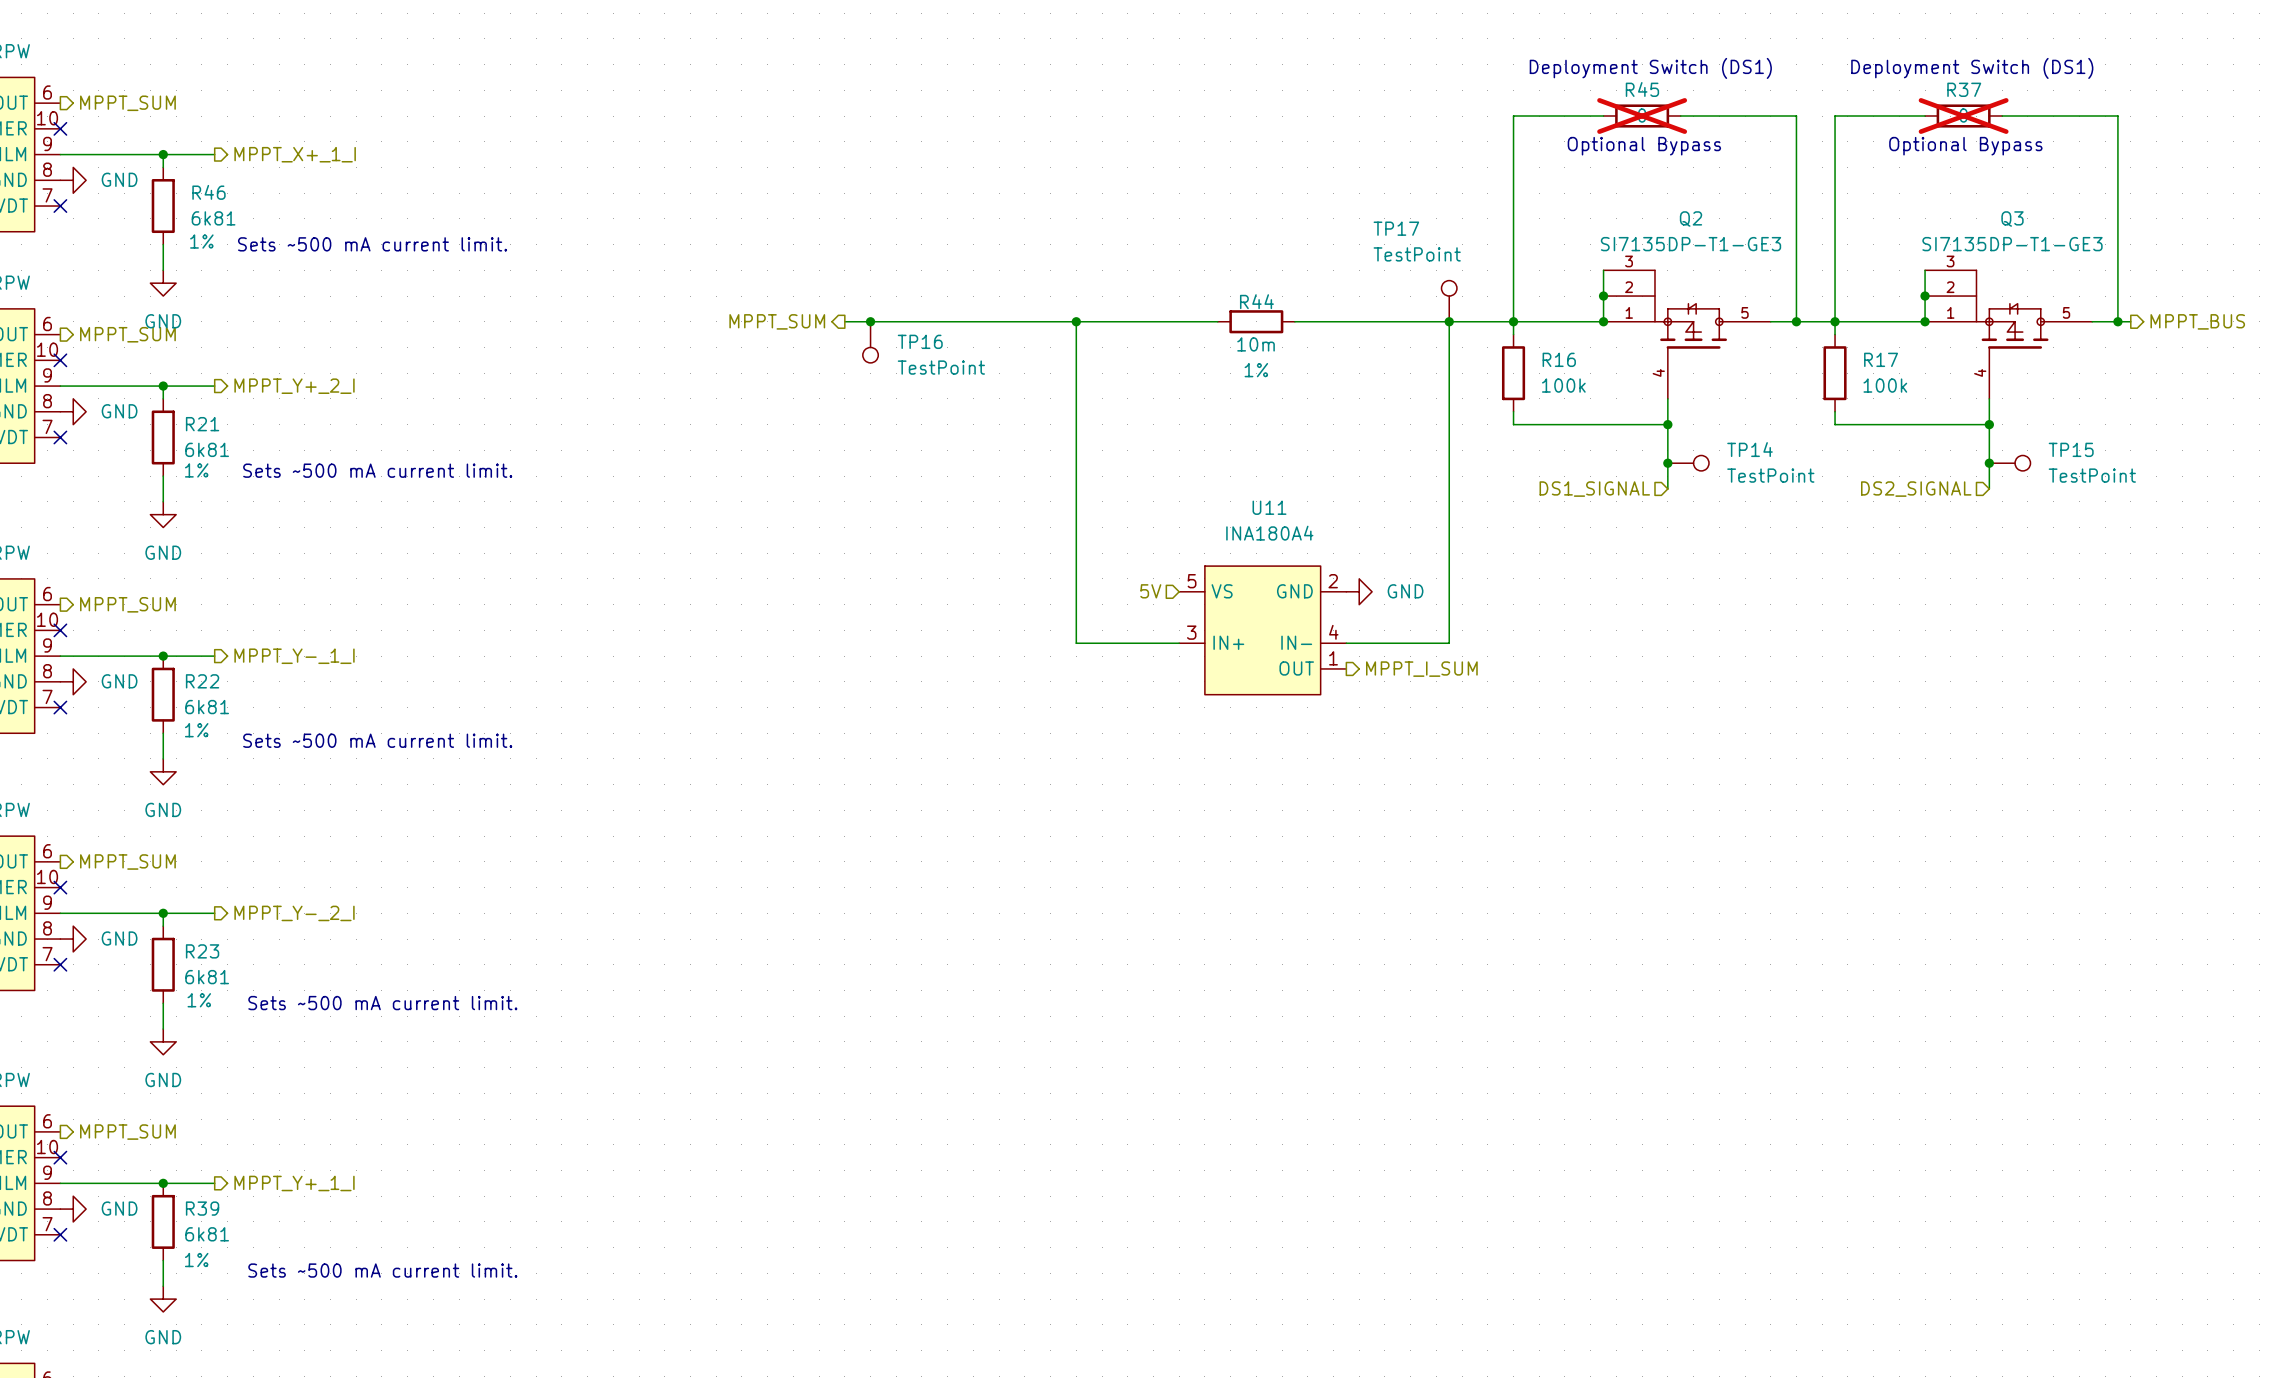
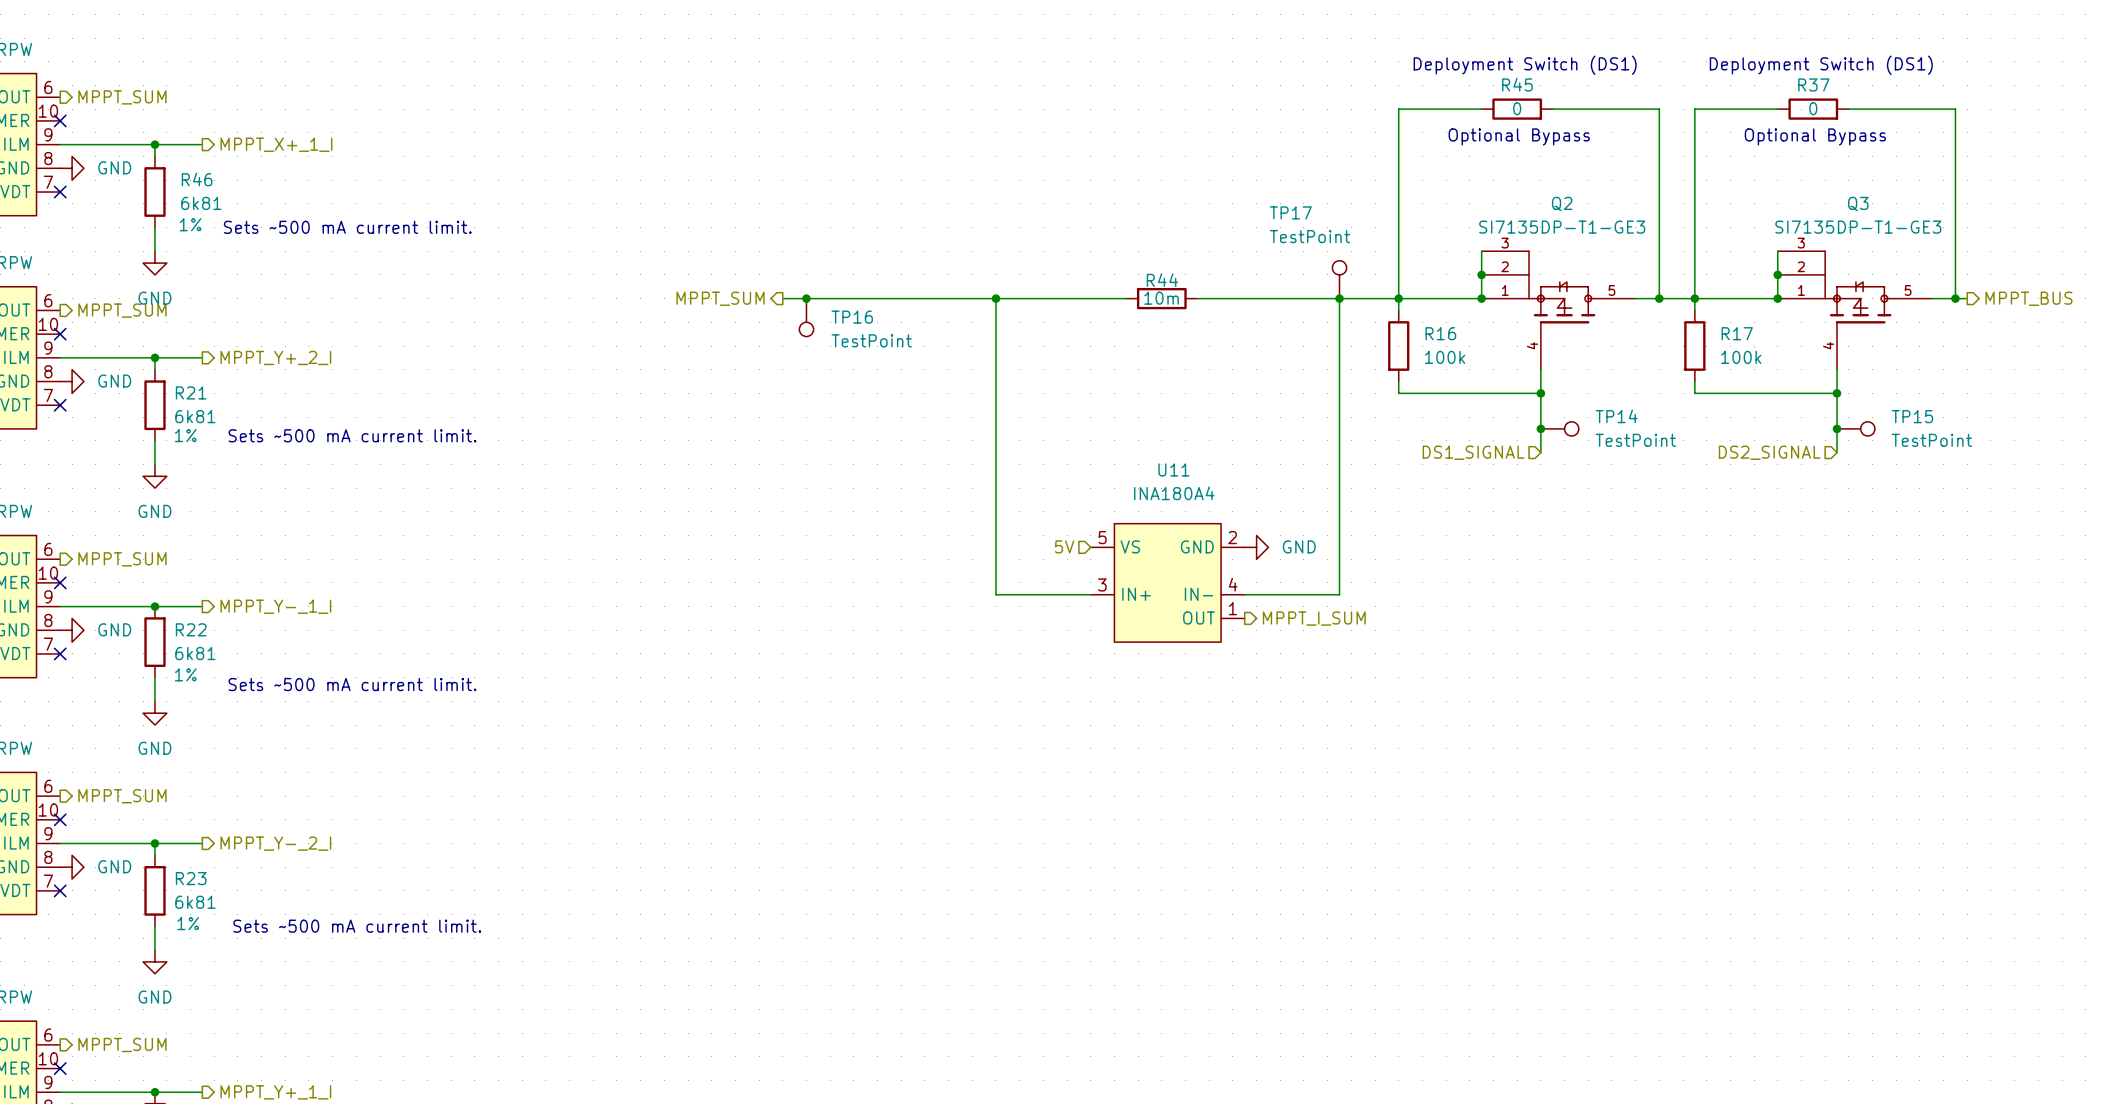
R45 do-not-place cross: (1642, 116) -> none
R37 do-not-place cross: (1963, 116) -> none
R44 value position: 10m (1256, 344) -> 10m (1161, 298)
R44 text: 1% (1256, 370) -> none

